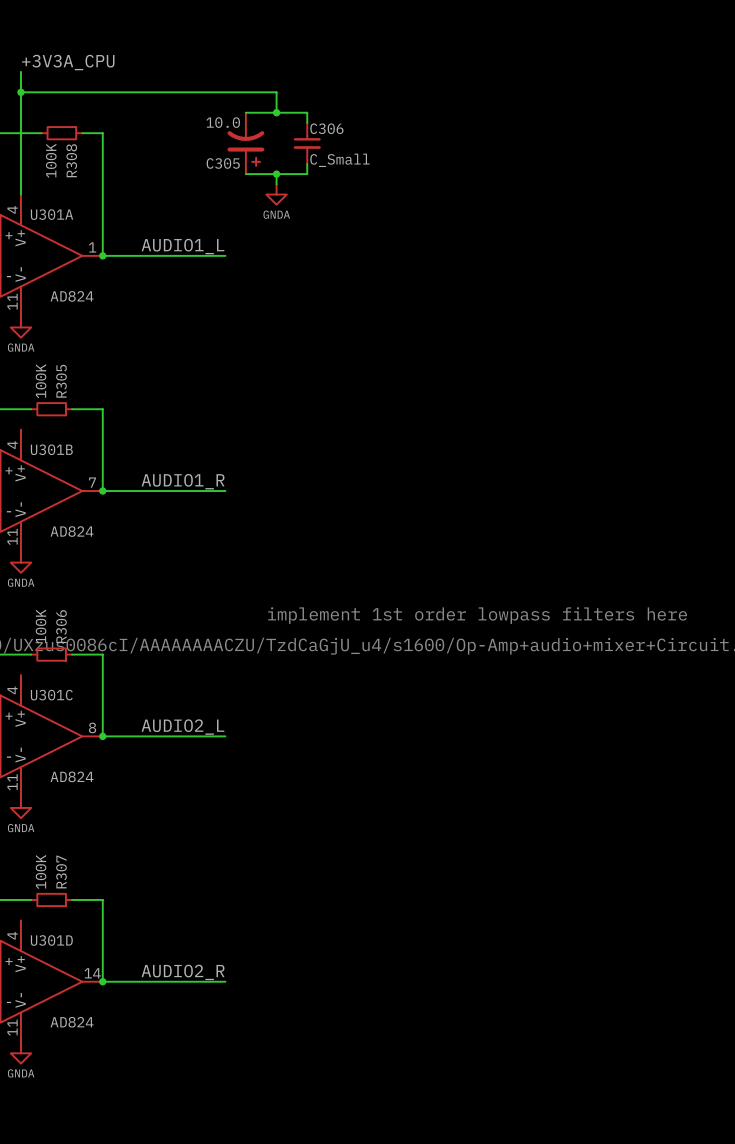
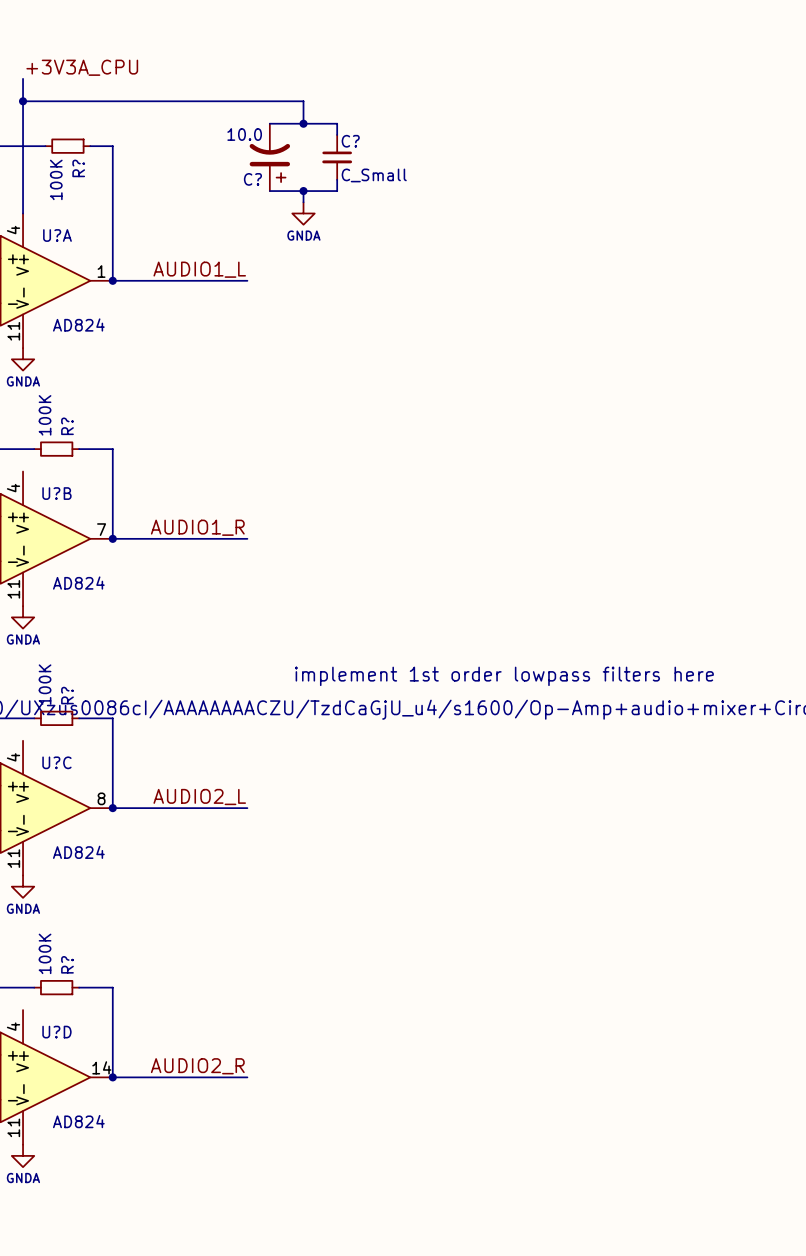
C306 name: C306 (326, 128) -> C? (350, 141)
R308 name: R308 (71, 160) -> R? (78, 168)
C305 name: C305 (223, 163) -> C? (252, 179)
U301A name: U301A (52, 214) -> U?A (57, 235)
R305 name: R305 (61, 381) -> R? (67, 426)
U301B name: U301B (51, 449) -> U?B (56, 493)
R306 name: R306 (61, 626) -> R? (67, 695)
U301C name: U301C (51, 695) -> U?C (56, 762)
R307 name: R307 (61, 872) -> R? (67, 964)
U301D name: U301D (51, 940) -> U?D (56, 1032)

